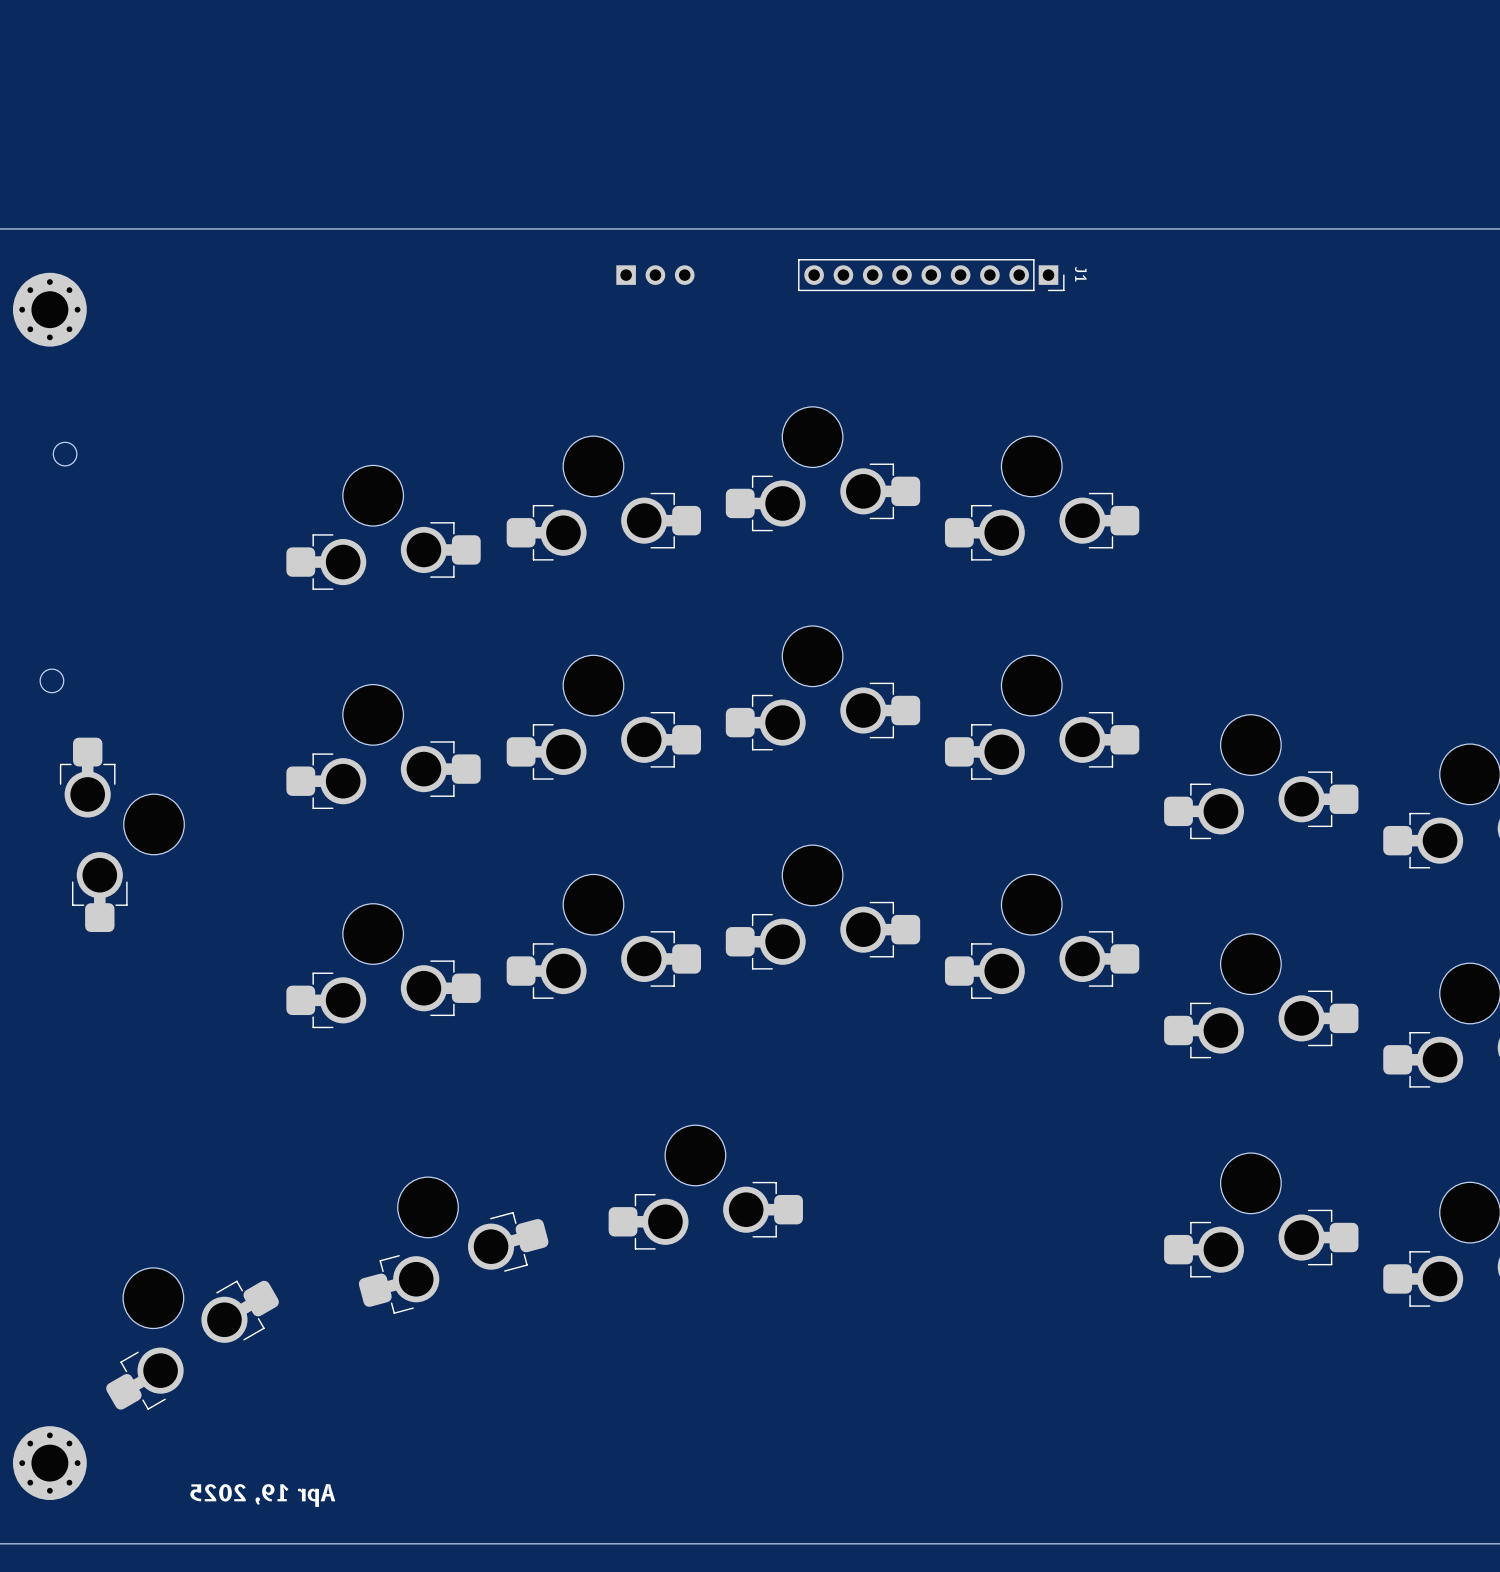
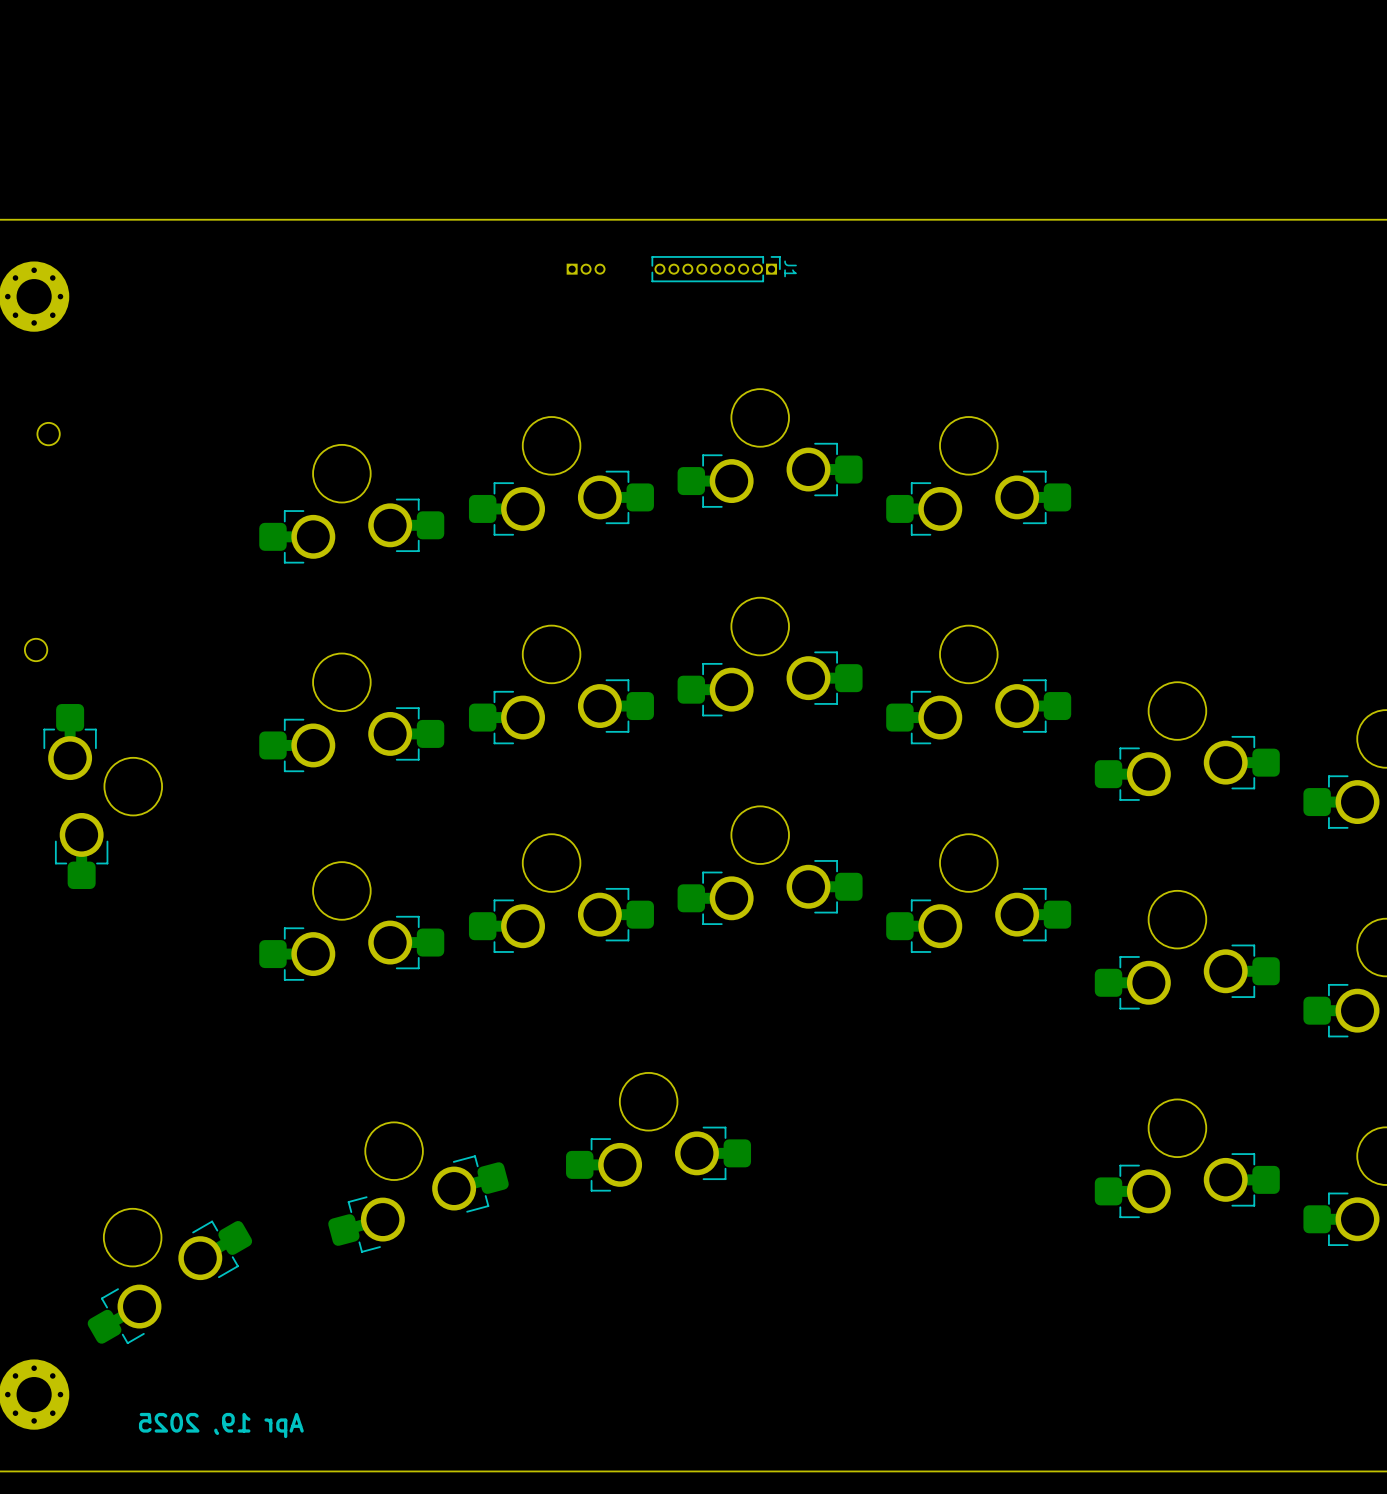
J1 footprint: [798, 259, 1065, 292] -> [651, 256, 781, 283]
J1 name position: J1 (1080, 274) -> J1 (790, 268)
part: (655, 275) -> none
part: none -> (586, 269)

